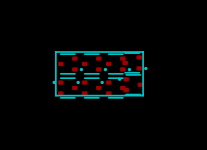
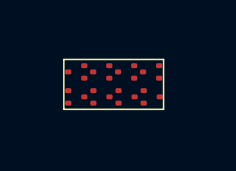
part footprint: [122, 52, 148, 74] -> [139, 63, 163, 81]
part footprint: [58, 53, 84, 75] -> [65, 63, 88, 81]
part footprint: [82, 53, 108, 75] -> [90, 63, 113, 81]
part: none -> (126, 71)
part: (118, 64) -> none
part footprint: [117, 74, 144, 96] -> [140, 88, 163, 106]
part footprint: [52, 77, 78, 99] -> [65, 88, 88, 106]
part footprint: [76, 77, 102, 99] -> [90, 88, 113, 106]
part footprint: [100, 77, 126, 99] -> [115, 88, 138, 106]

